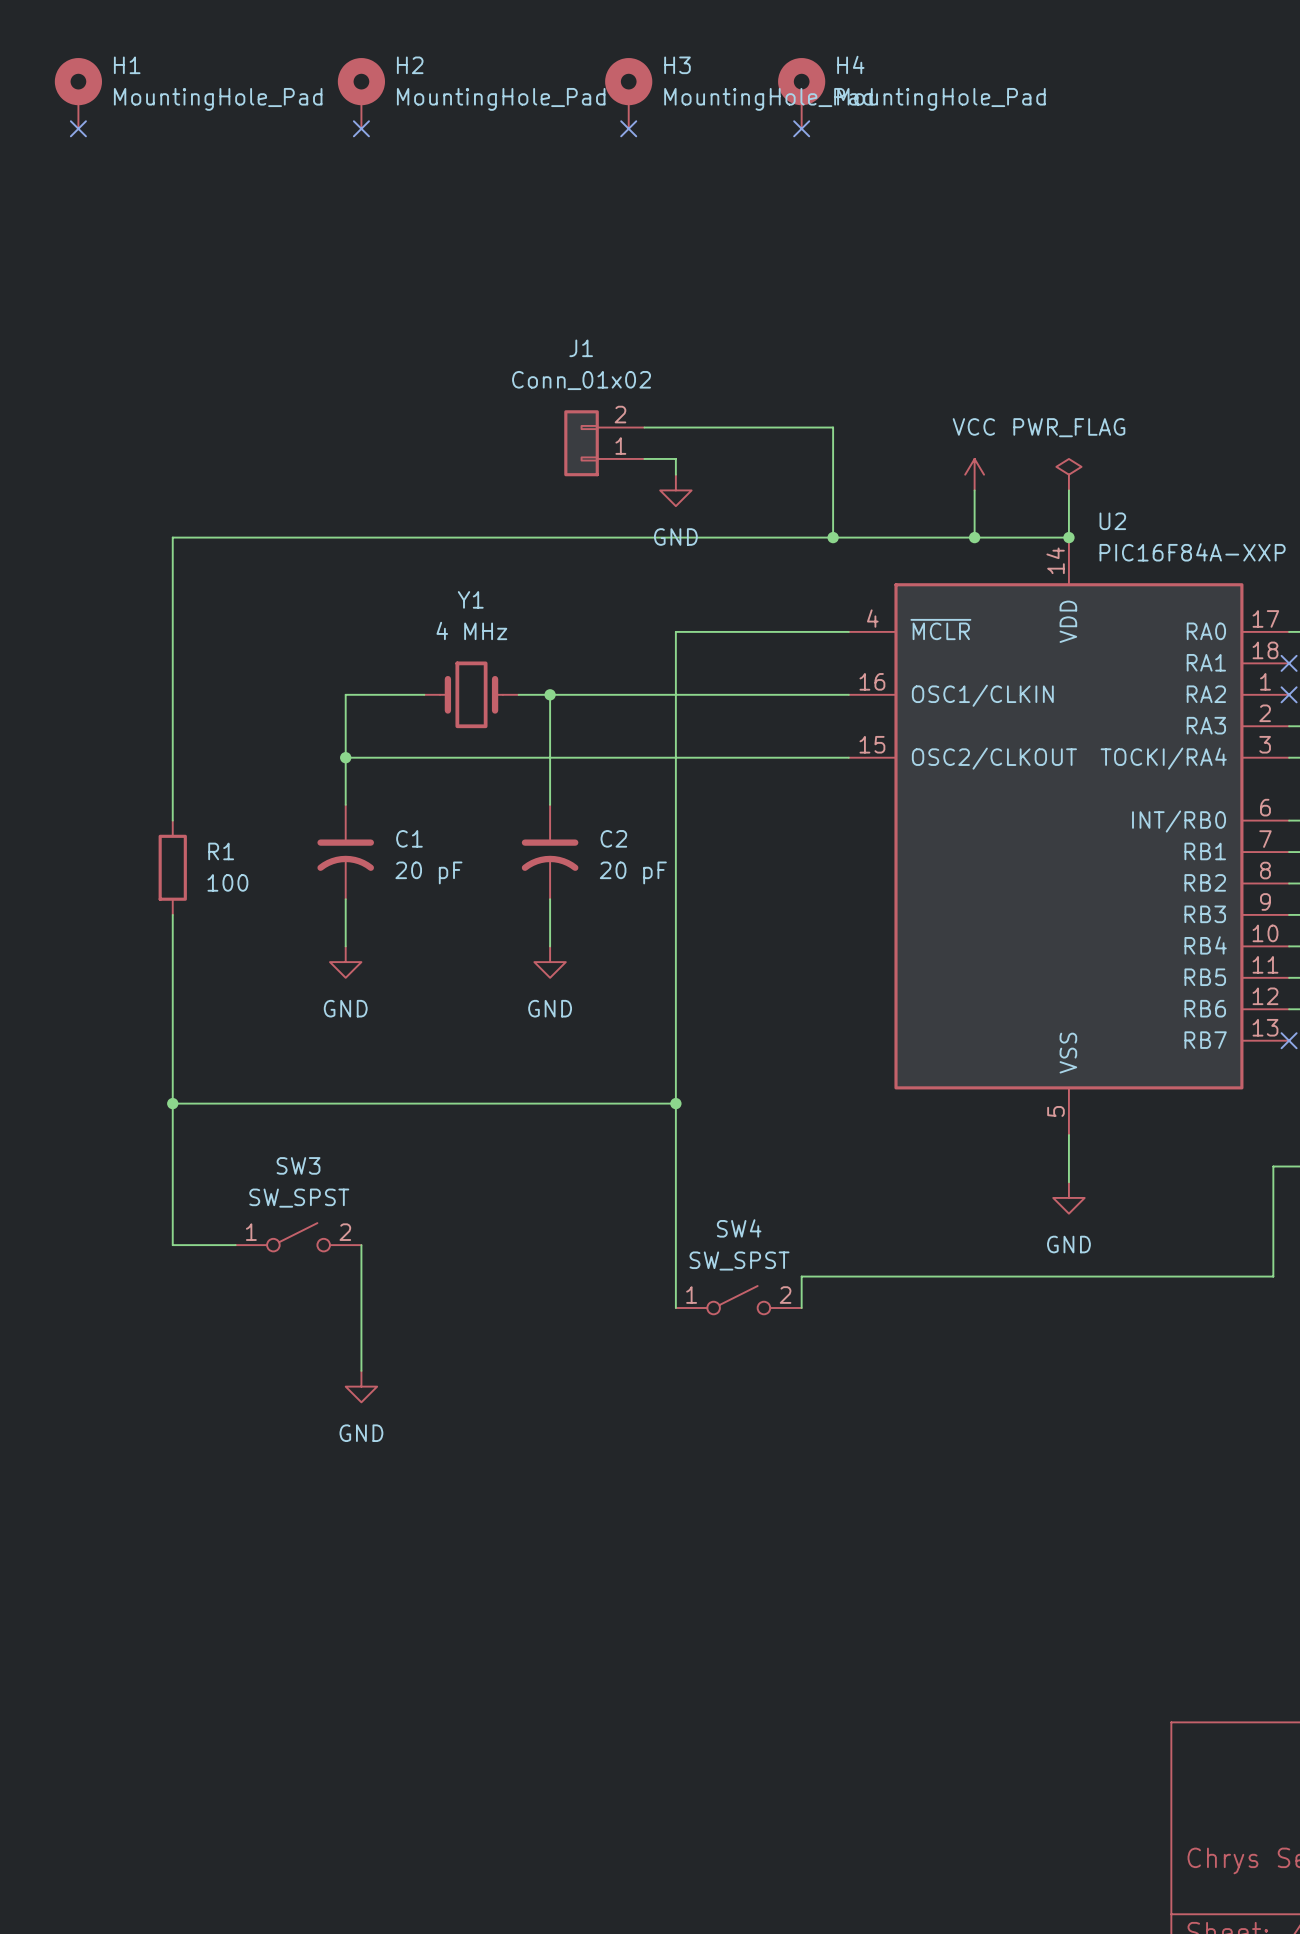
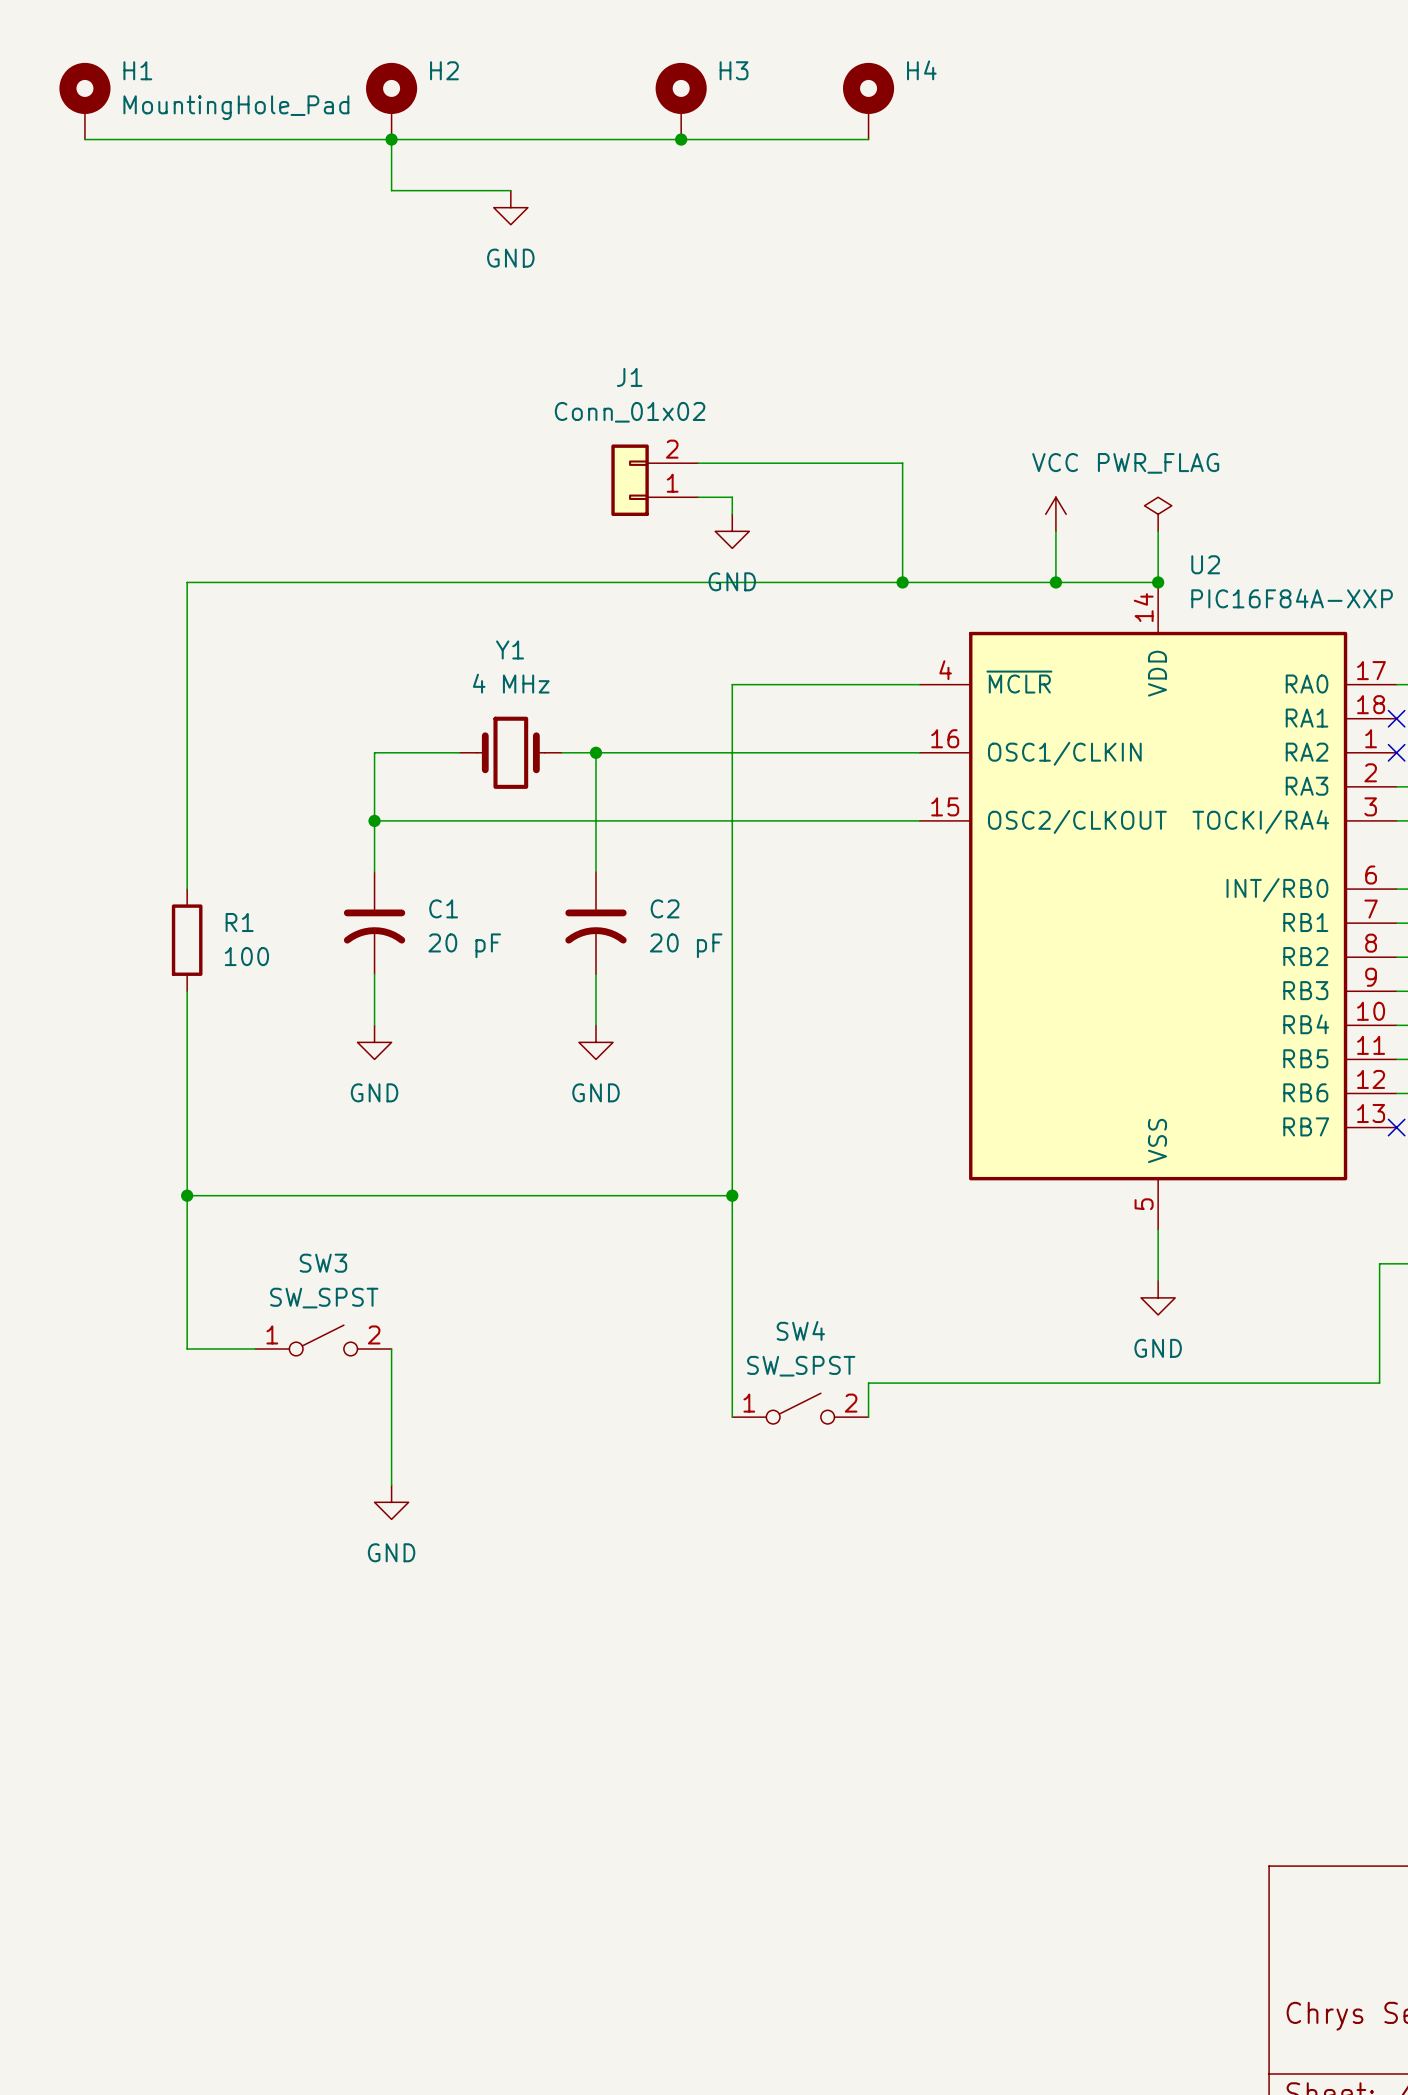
H2 value: MountingHole_Pad (501, 99) -> none
H3 value: MountingHole_Pad (768, 99) -> none
H4 value: MountingHole_Pad (941, 99) -> none
wire: none -> (84, 139) (868, 139)
no-connect mark: (78, 128) -> none
wire: none -> (391, 139) (391, 190) (510, 190)
no-connect mark: (361, 128) -> none
junction: none -> (391, 139)
no-connect mark: (628, 128) -> none
junction: none -> (681, 139)
no-connect mark: (801, 128) -> none
power symbol: none -> GND (510, 207)

